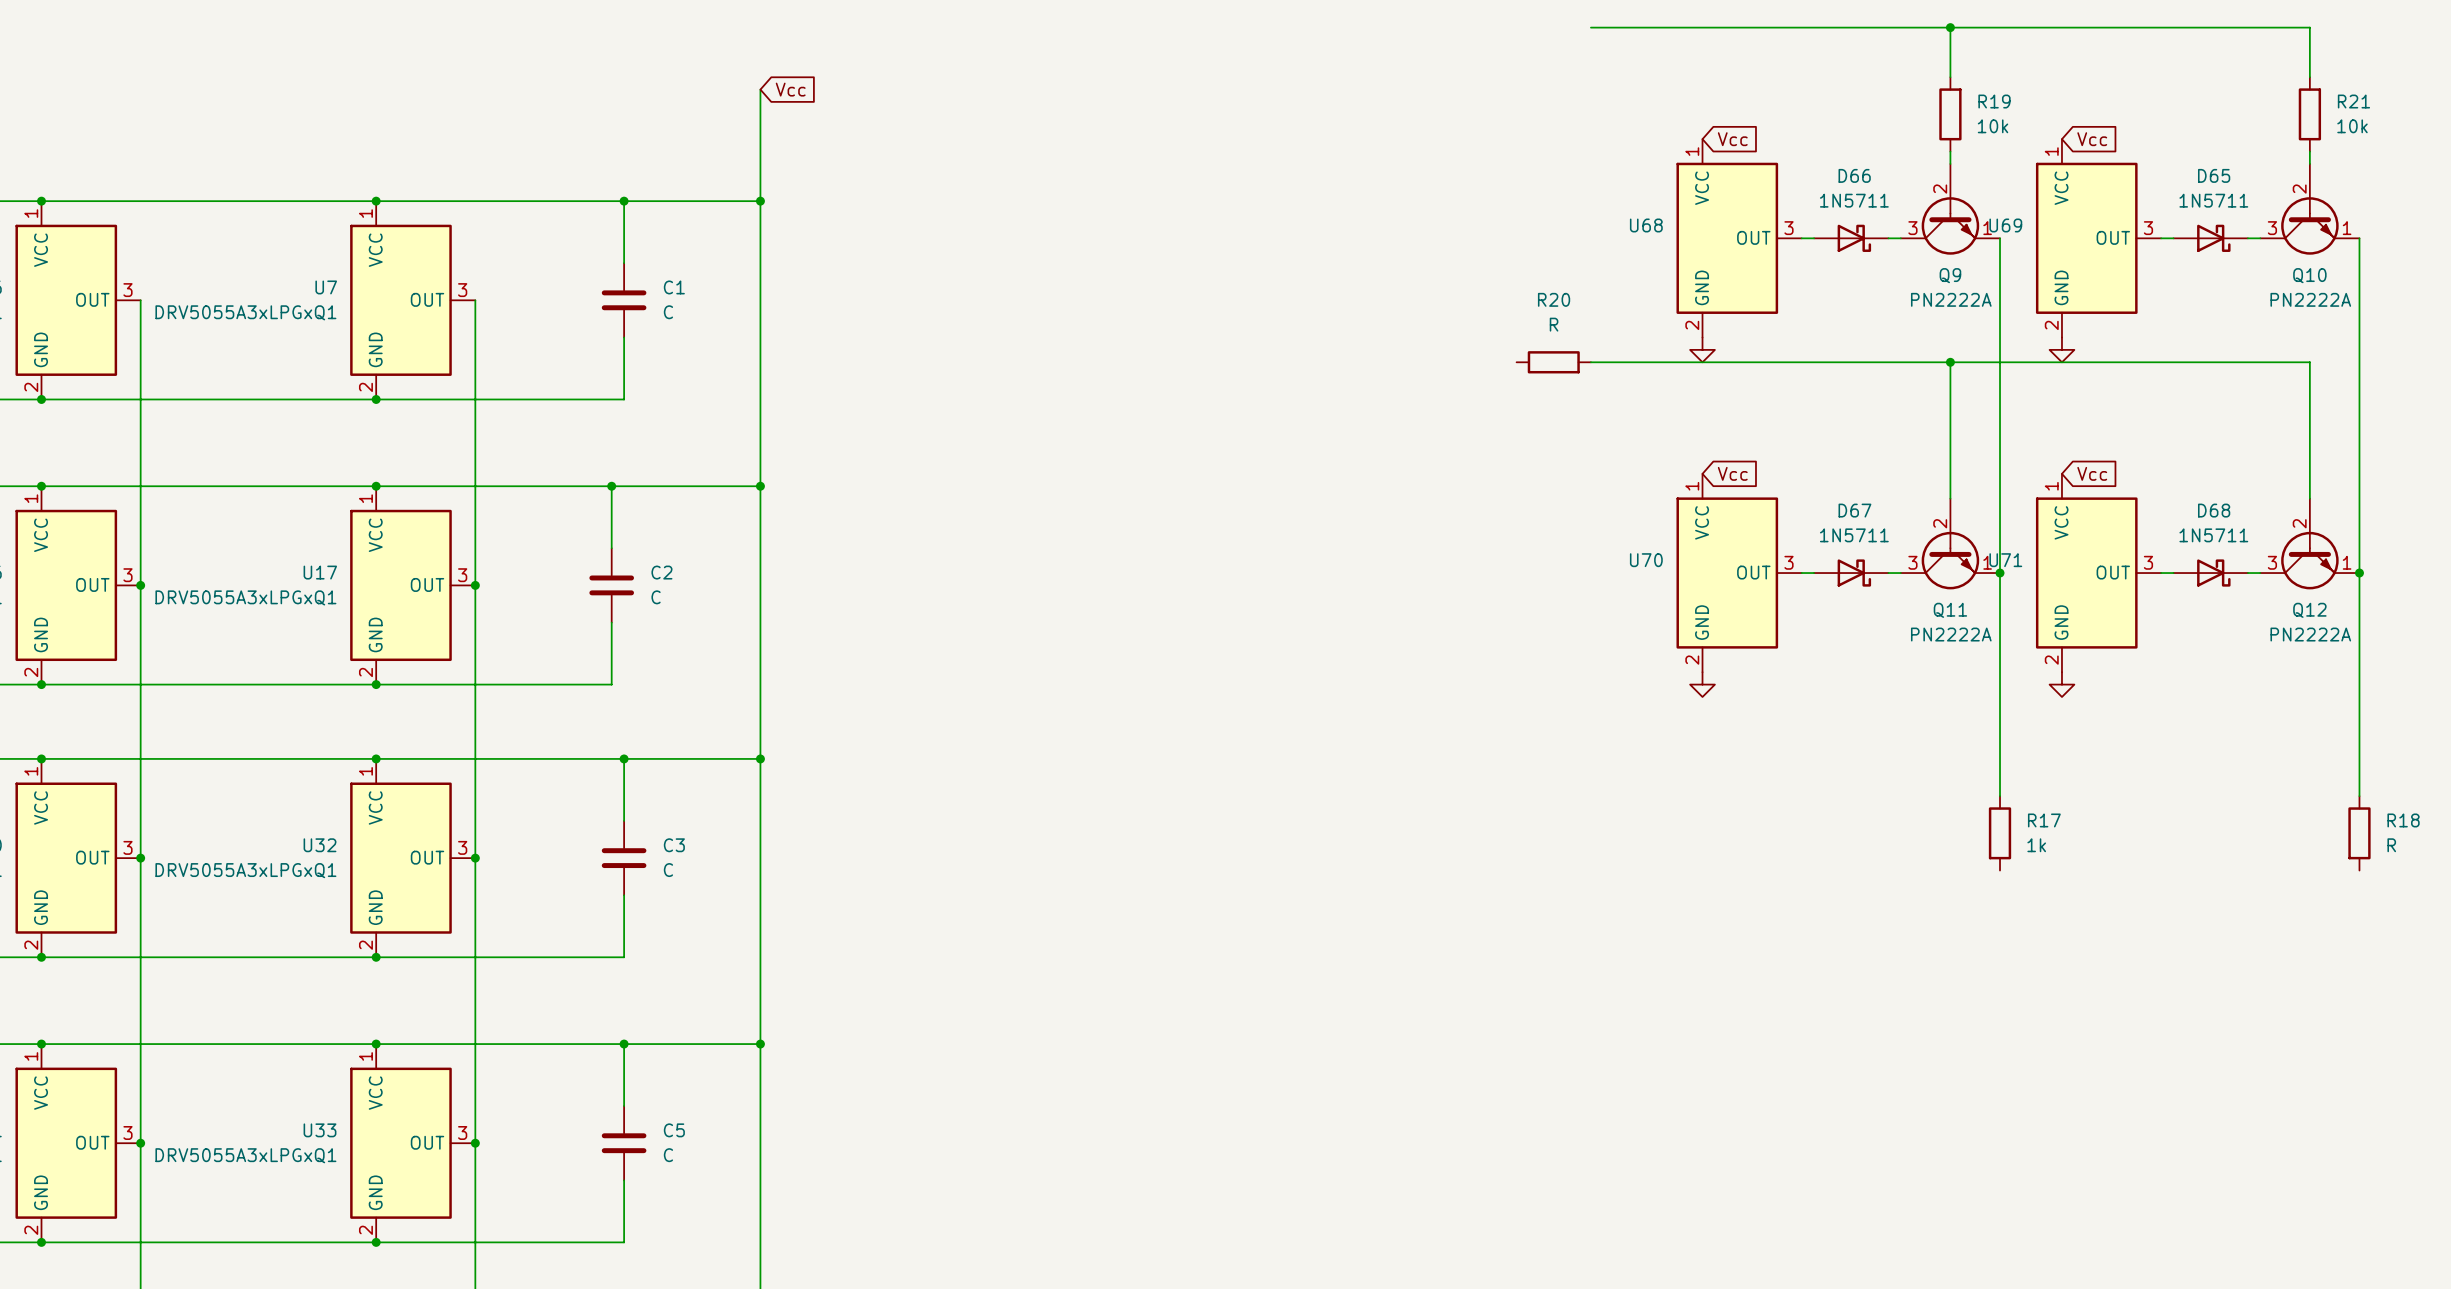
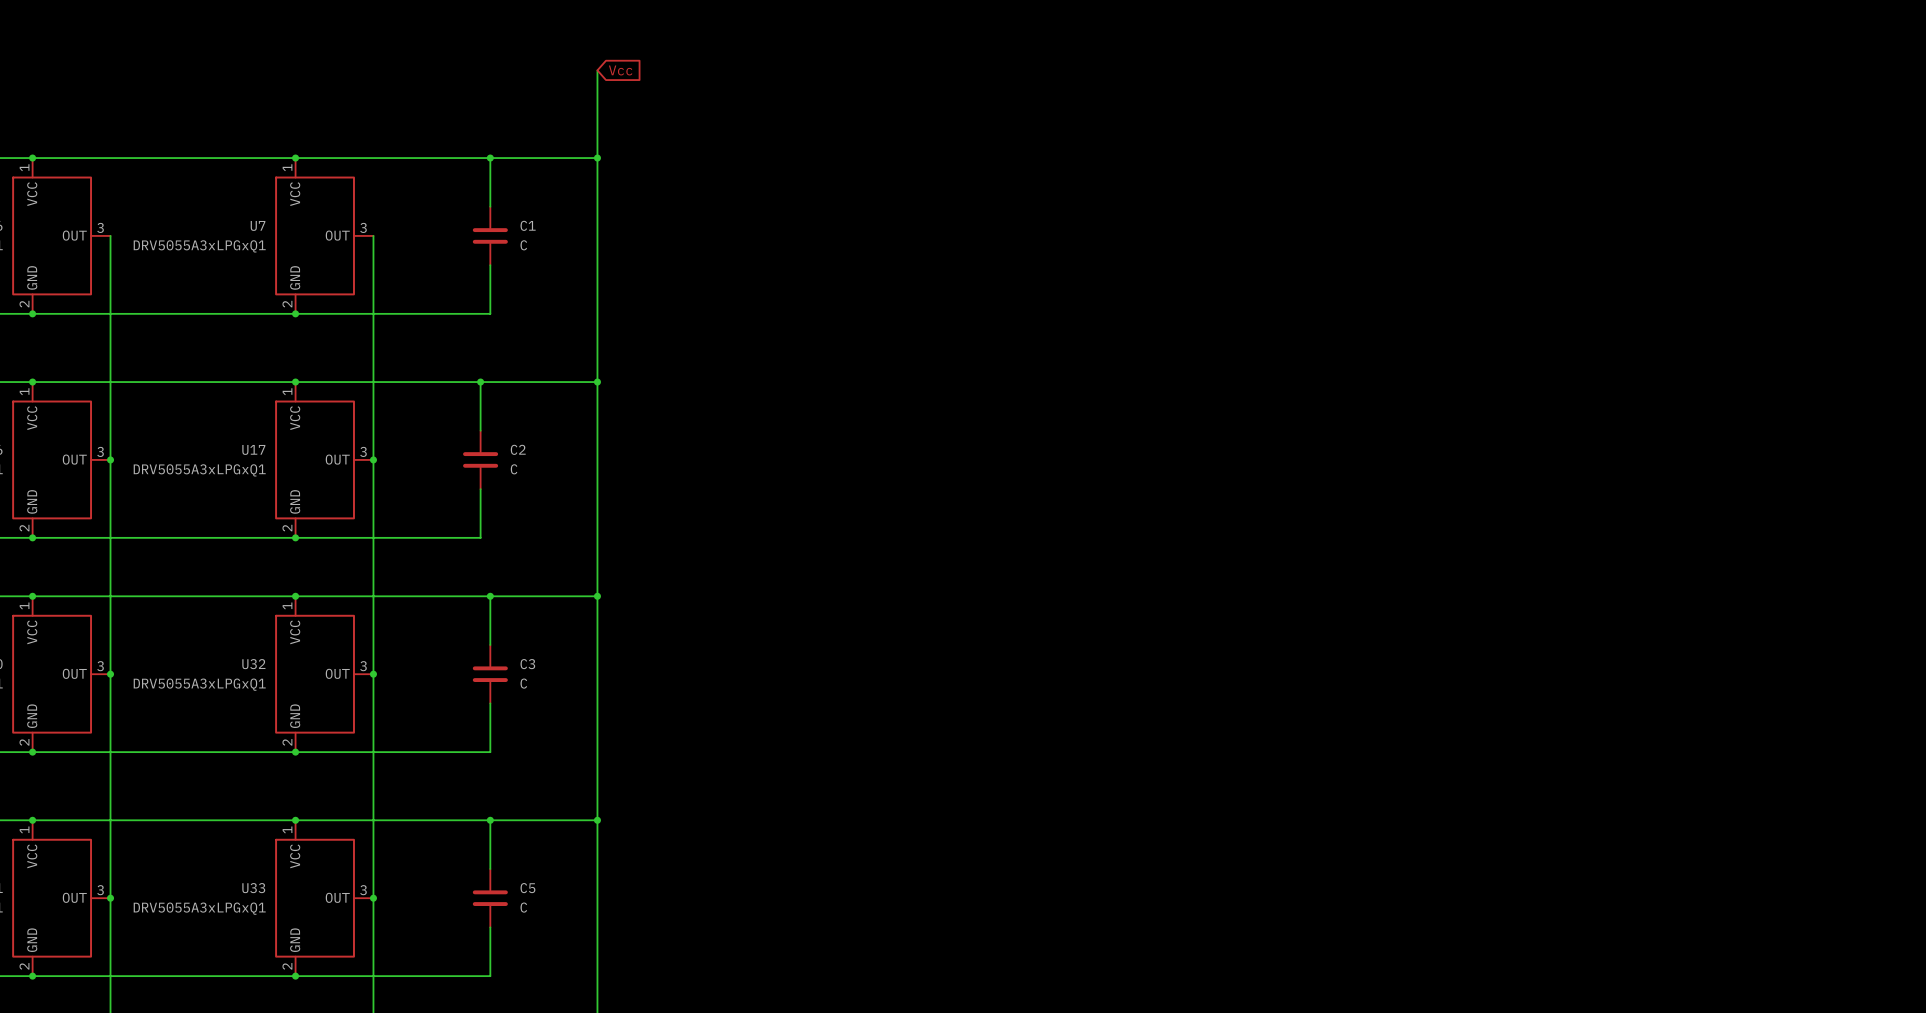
wire: (1590, 27) (2309, 27) (2309, 77) -> none
wire: (1950, 27) (1950, 77) -> none
junction: (1950, 27) -> none
R19: 10k (1950, 114) -> none
R21: 10k (2309, 114) -> none
global label: Vcc (1732, 139) -> none
global label: Vcc (2092, 139) -> none
wire: (1950, 151) (1950, 163) -> none
wire: (2309, 151) (2309, 163) -> none
Q9: PN2222A (1950, 209) -> none
Q10: PN2222A (2309, 209) -> none
U68: (1739, 238) -> none
wire: (1801, 238) (1814, 238) -> none
D66: 1N5711 (1851, 238) -> none
wire: (1888, 238) (1900, 238) -> none
wire: (2000, 238) (2000, 796) -> none
U69: (2098, 238) -> none
wire: (2161, 238) (2173, 238) -> none
D65: 1N5711 (2210, 238) -> none
wire: (2247, 238) (2260, 238) -> none
wire: (2359, 238) (2359, 796) -> none
power symbol: (1702, 349) -> none
power symbol: (2061, 349) -> none
R20: R (1553, 362) -> none
wire: (1590, 362) (2309, 362) (2309, 498) -> none
wire: (1950, 362) (1950, 498) -> none
junction: (1950, 362) -> none
global label: Vcc (1732, 473) -> none
global label: Vcc (2092, 473) -> none
Q11: PN2222A (1950, 544) -> none
Q12: PN2222A (2309, 544) -> none
U70: (1739, 573) -> none
wire: (1801, 573) (1814, 573) -> none
D67: 1N5711 (1851, 573) -> none
wire: (1888, 573) (1900, 573) -> none
junction: (2000, 573) -> none
U71: (2098, 573) -> none
wire: (2161, 573) (2173, 573) -> none
D68: 1N5711 (2210, 573) -> none
wire: (2247, 573) (2260, 573) -> none
junction: (2359, 573) -> none
power symbol: (1702, 684) -> none
power symbol: (2061, 684) -> none
R17: 1k (2000, 833) -> none
R18: R (2359, 833) -> none

